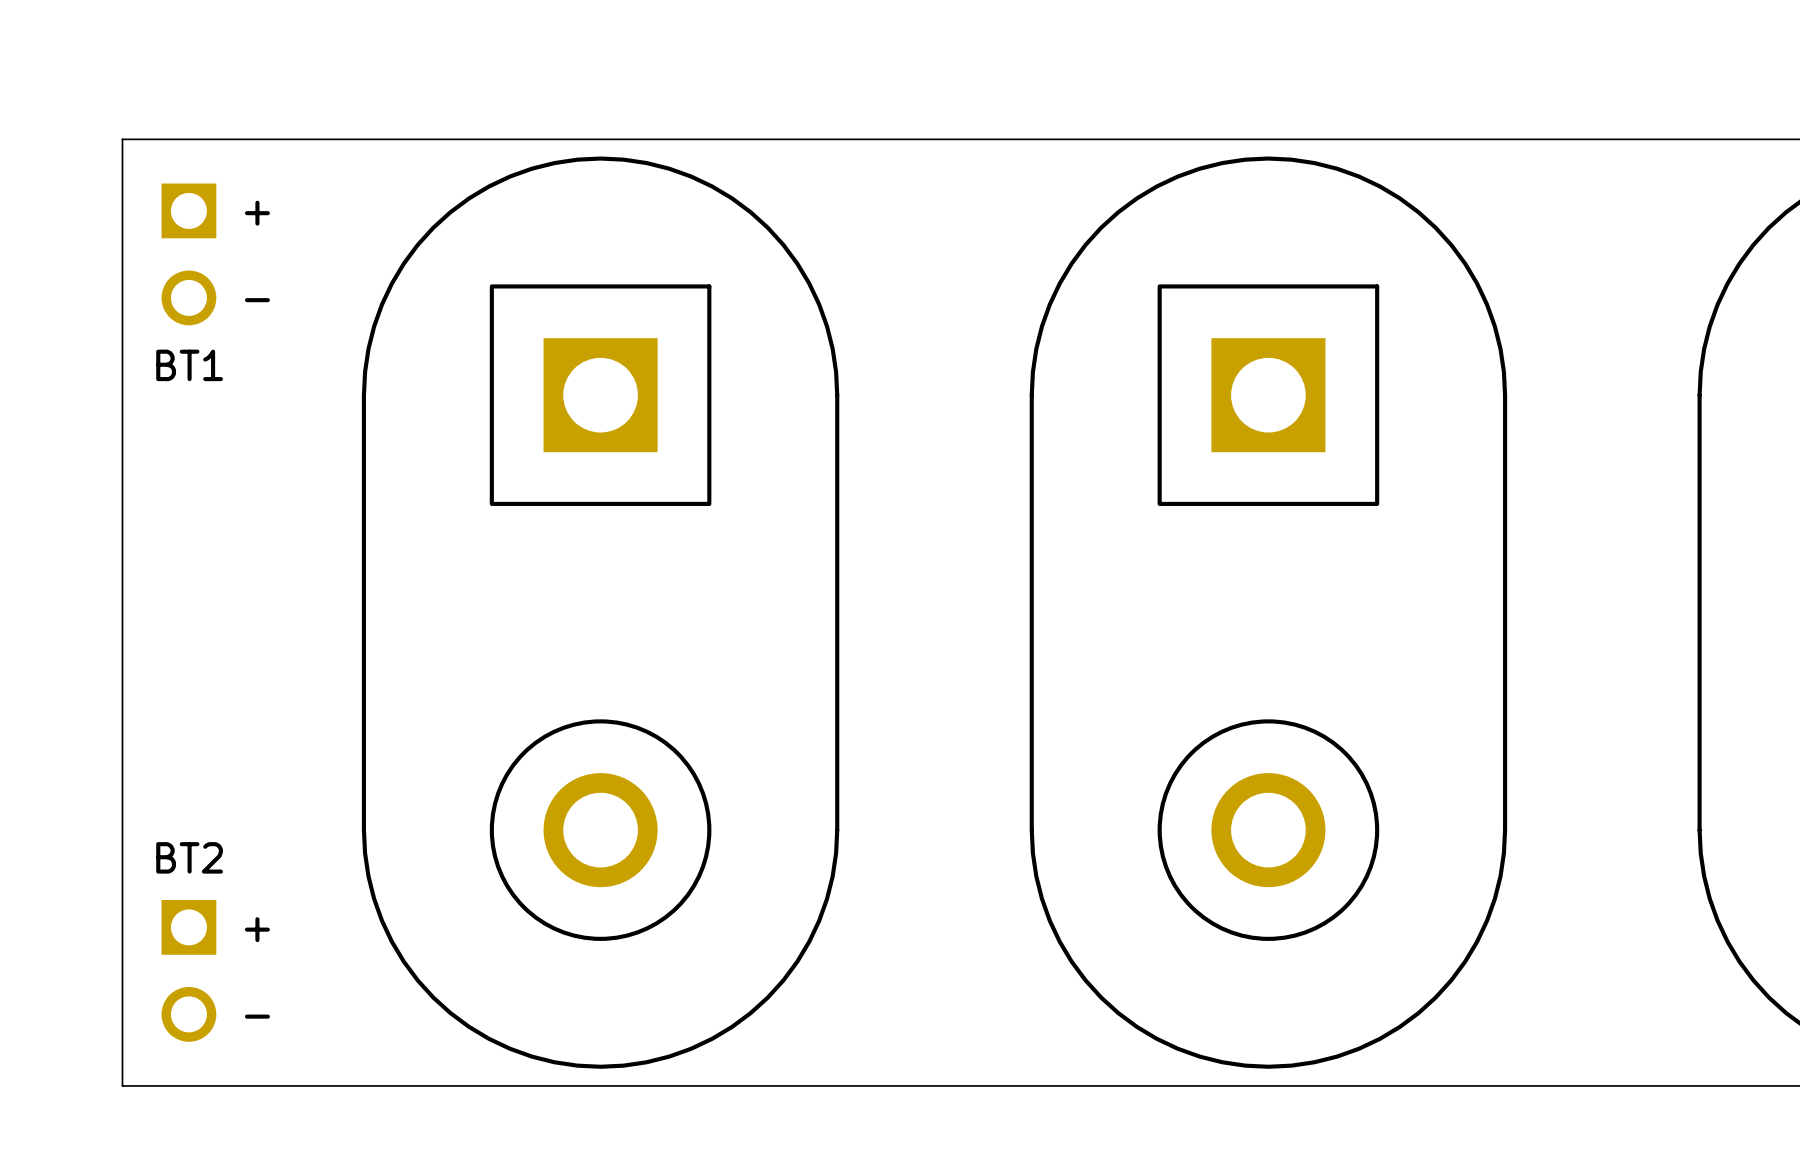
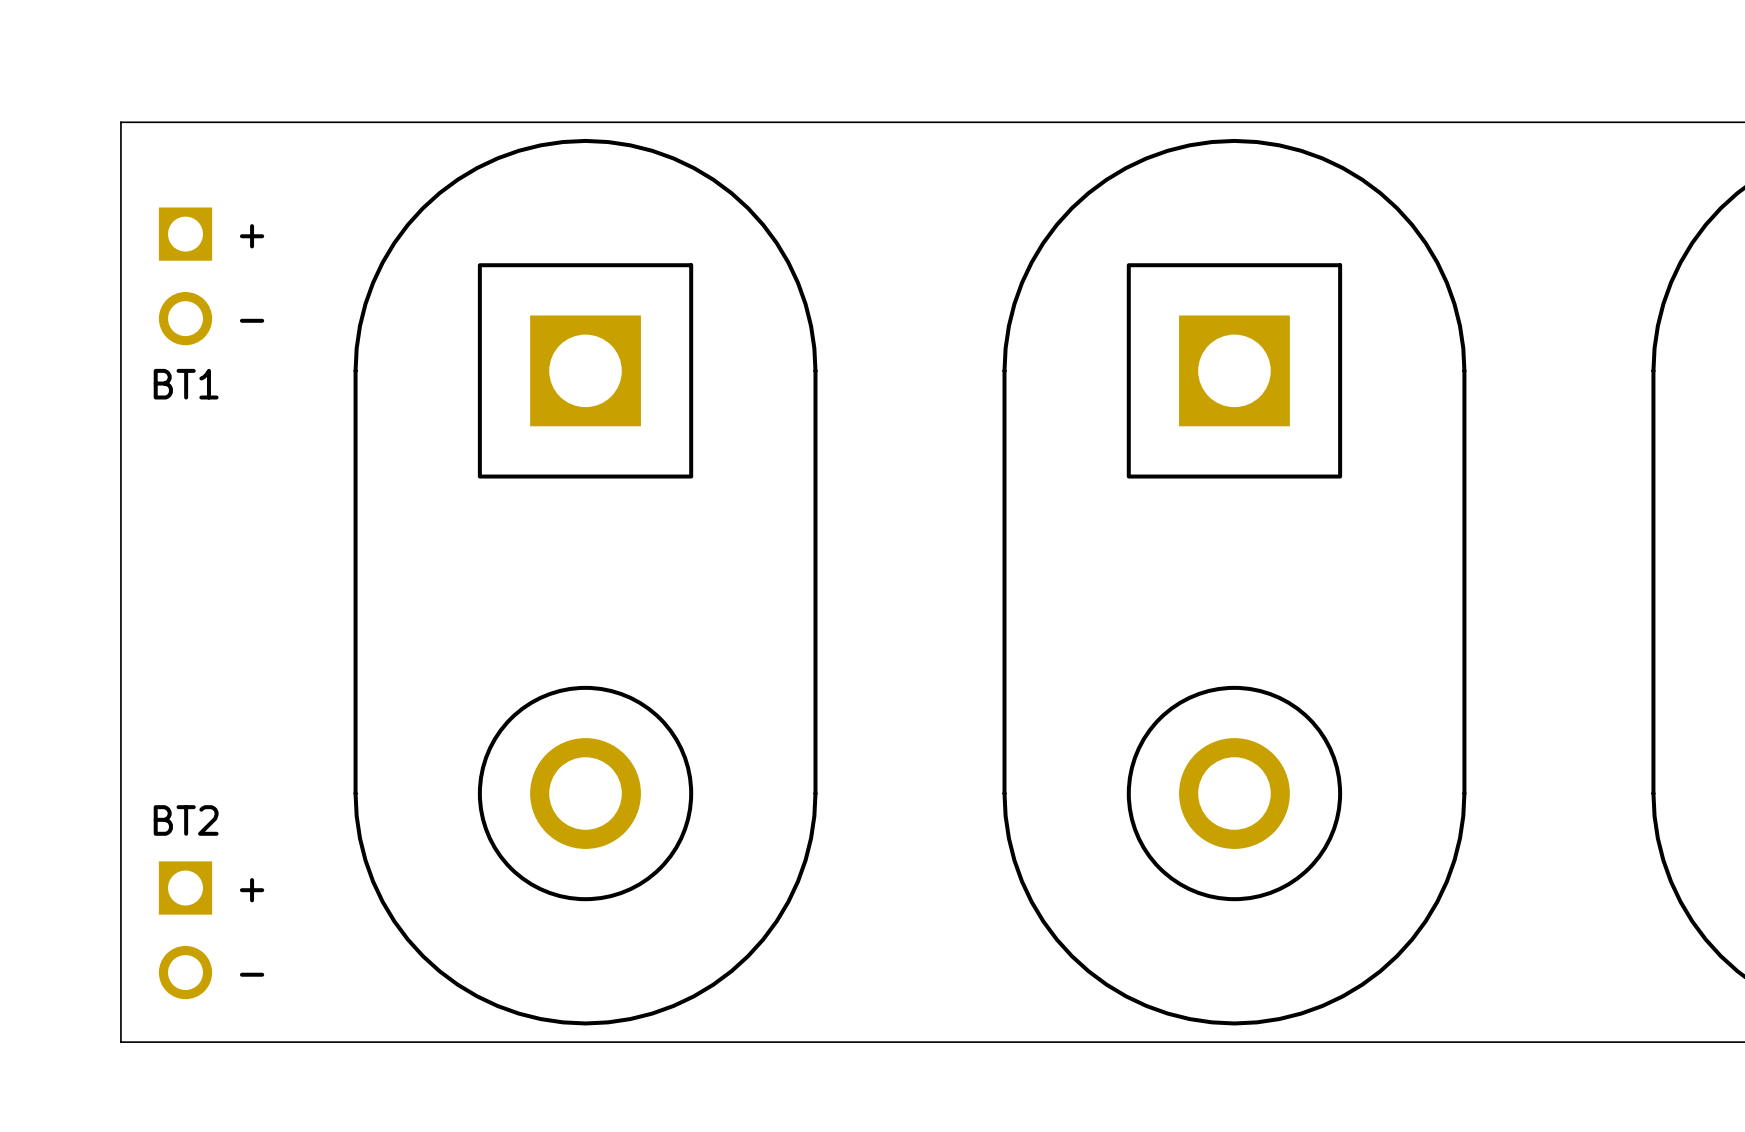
text position: + (257, 213) -> + (252, 236)
part position: (188, 254) -> (185, 276)
text position: - (257, 300) -> - (252, 320)
text position: BT1 (189, 365) -> BT1 (186, 384)

